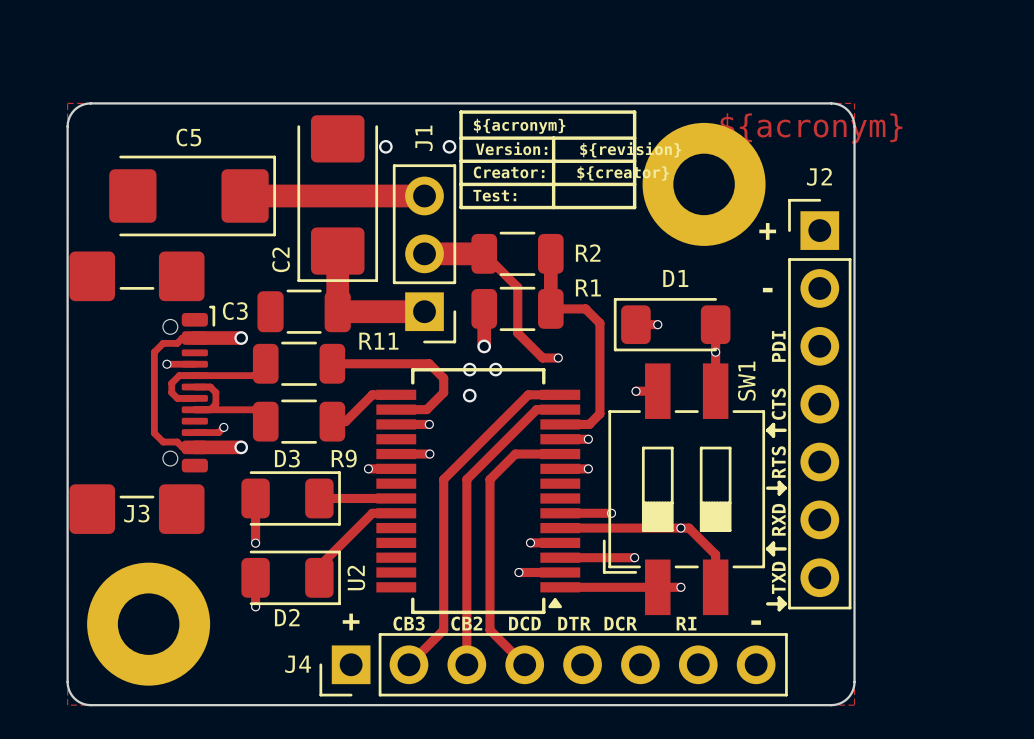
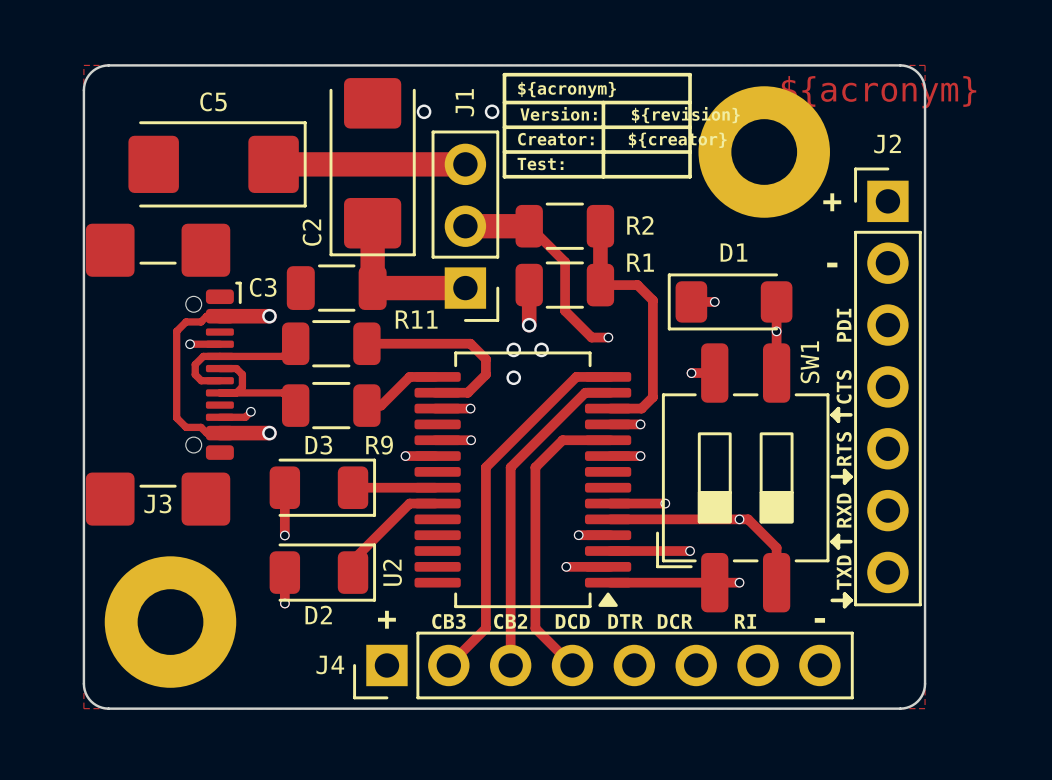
SW1 footprint: [602, 363, 766, 616] -> [656, 343, 830, 613]
U2 footprint: [376, 368, 581, 615] -> [414, 351, 632, 609]

